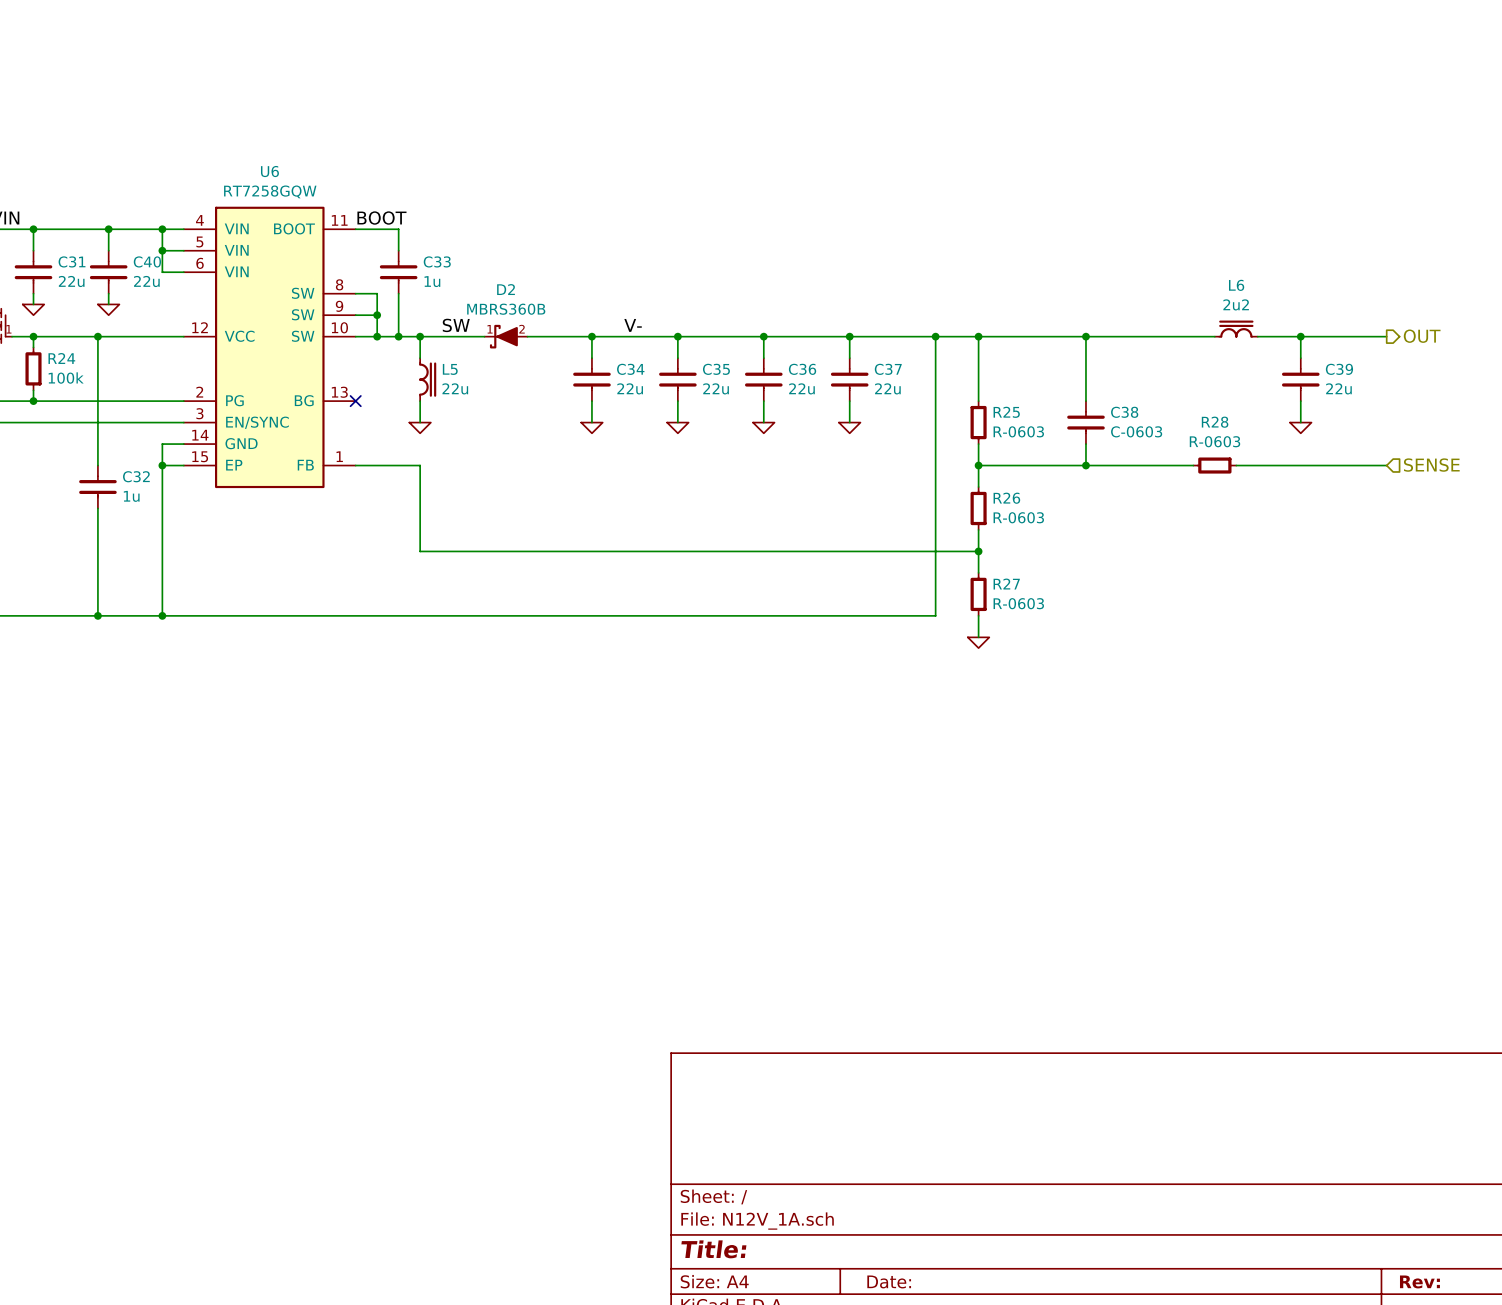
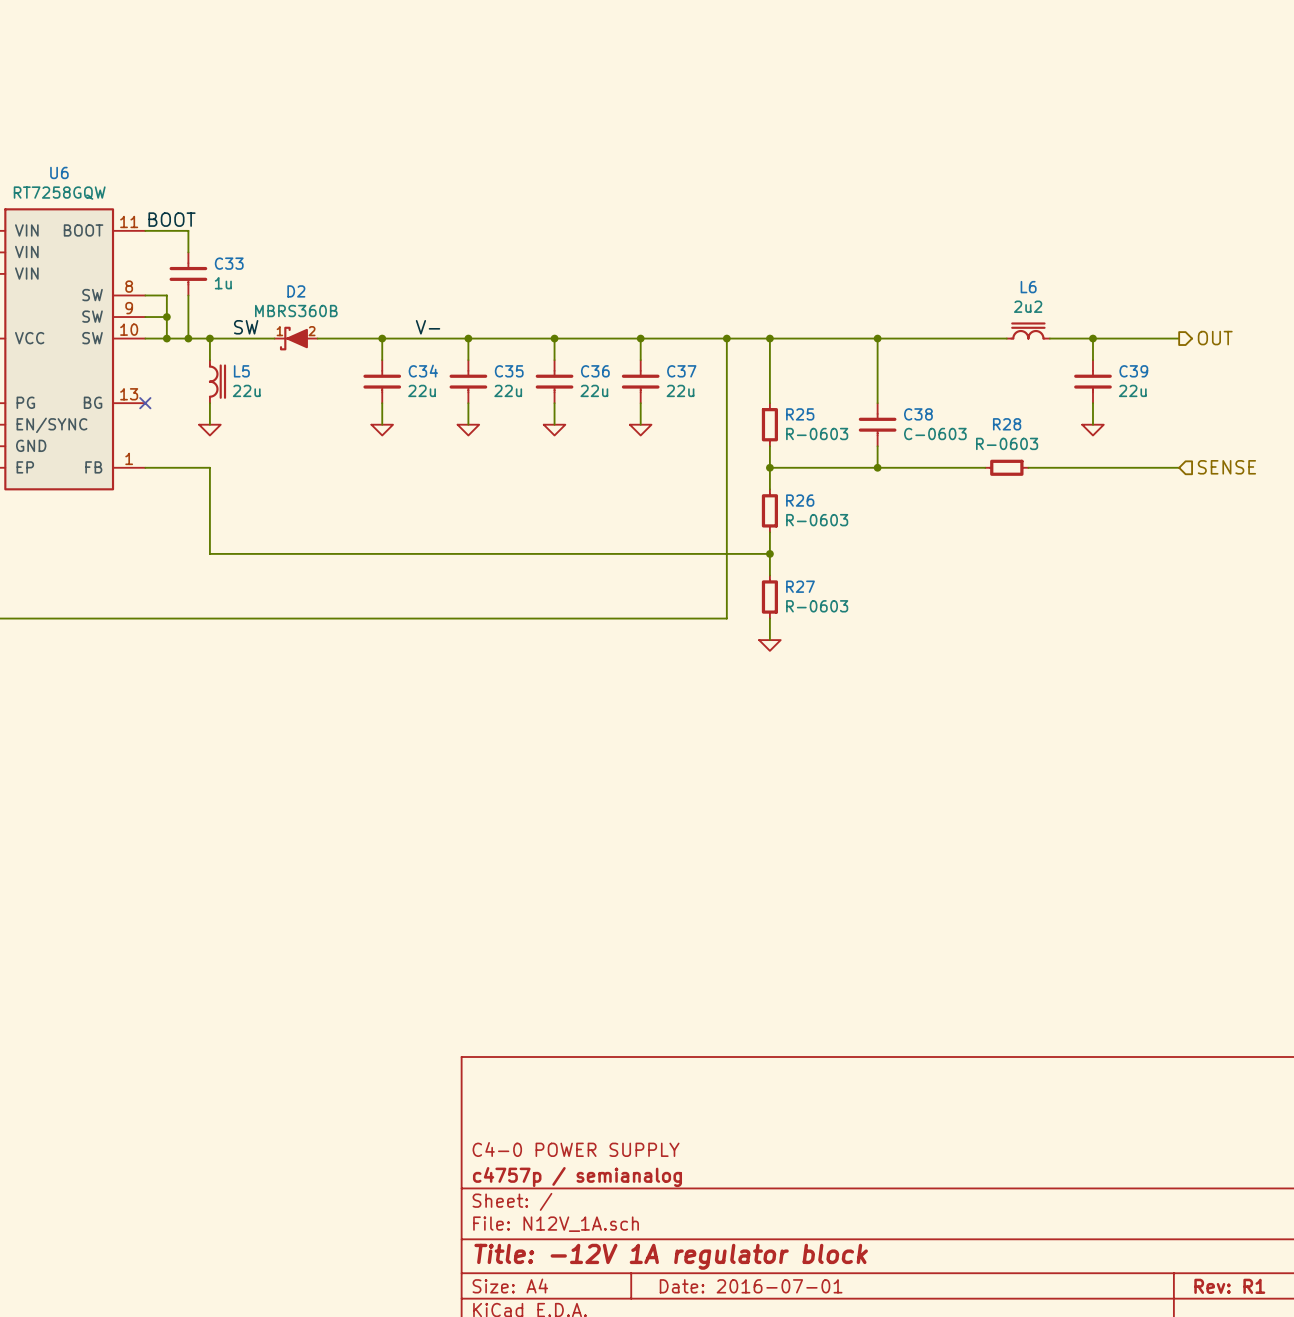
title block: none -> C4-0 POWER SUPPLY (576, 1149)
title block: none -> c4757p / semianalog (577, 1177)
title block: Title: (713, 1249) -> Title: -12V 1A regulator block (671, 1256)
title block: Date: (889, 1281) -> Date: 2016-07-01 (751, 1286)
title block: Rev: (1419, 1281) -> Rev: R1 (1229, 1286)

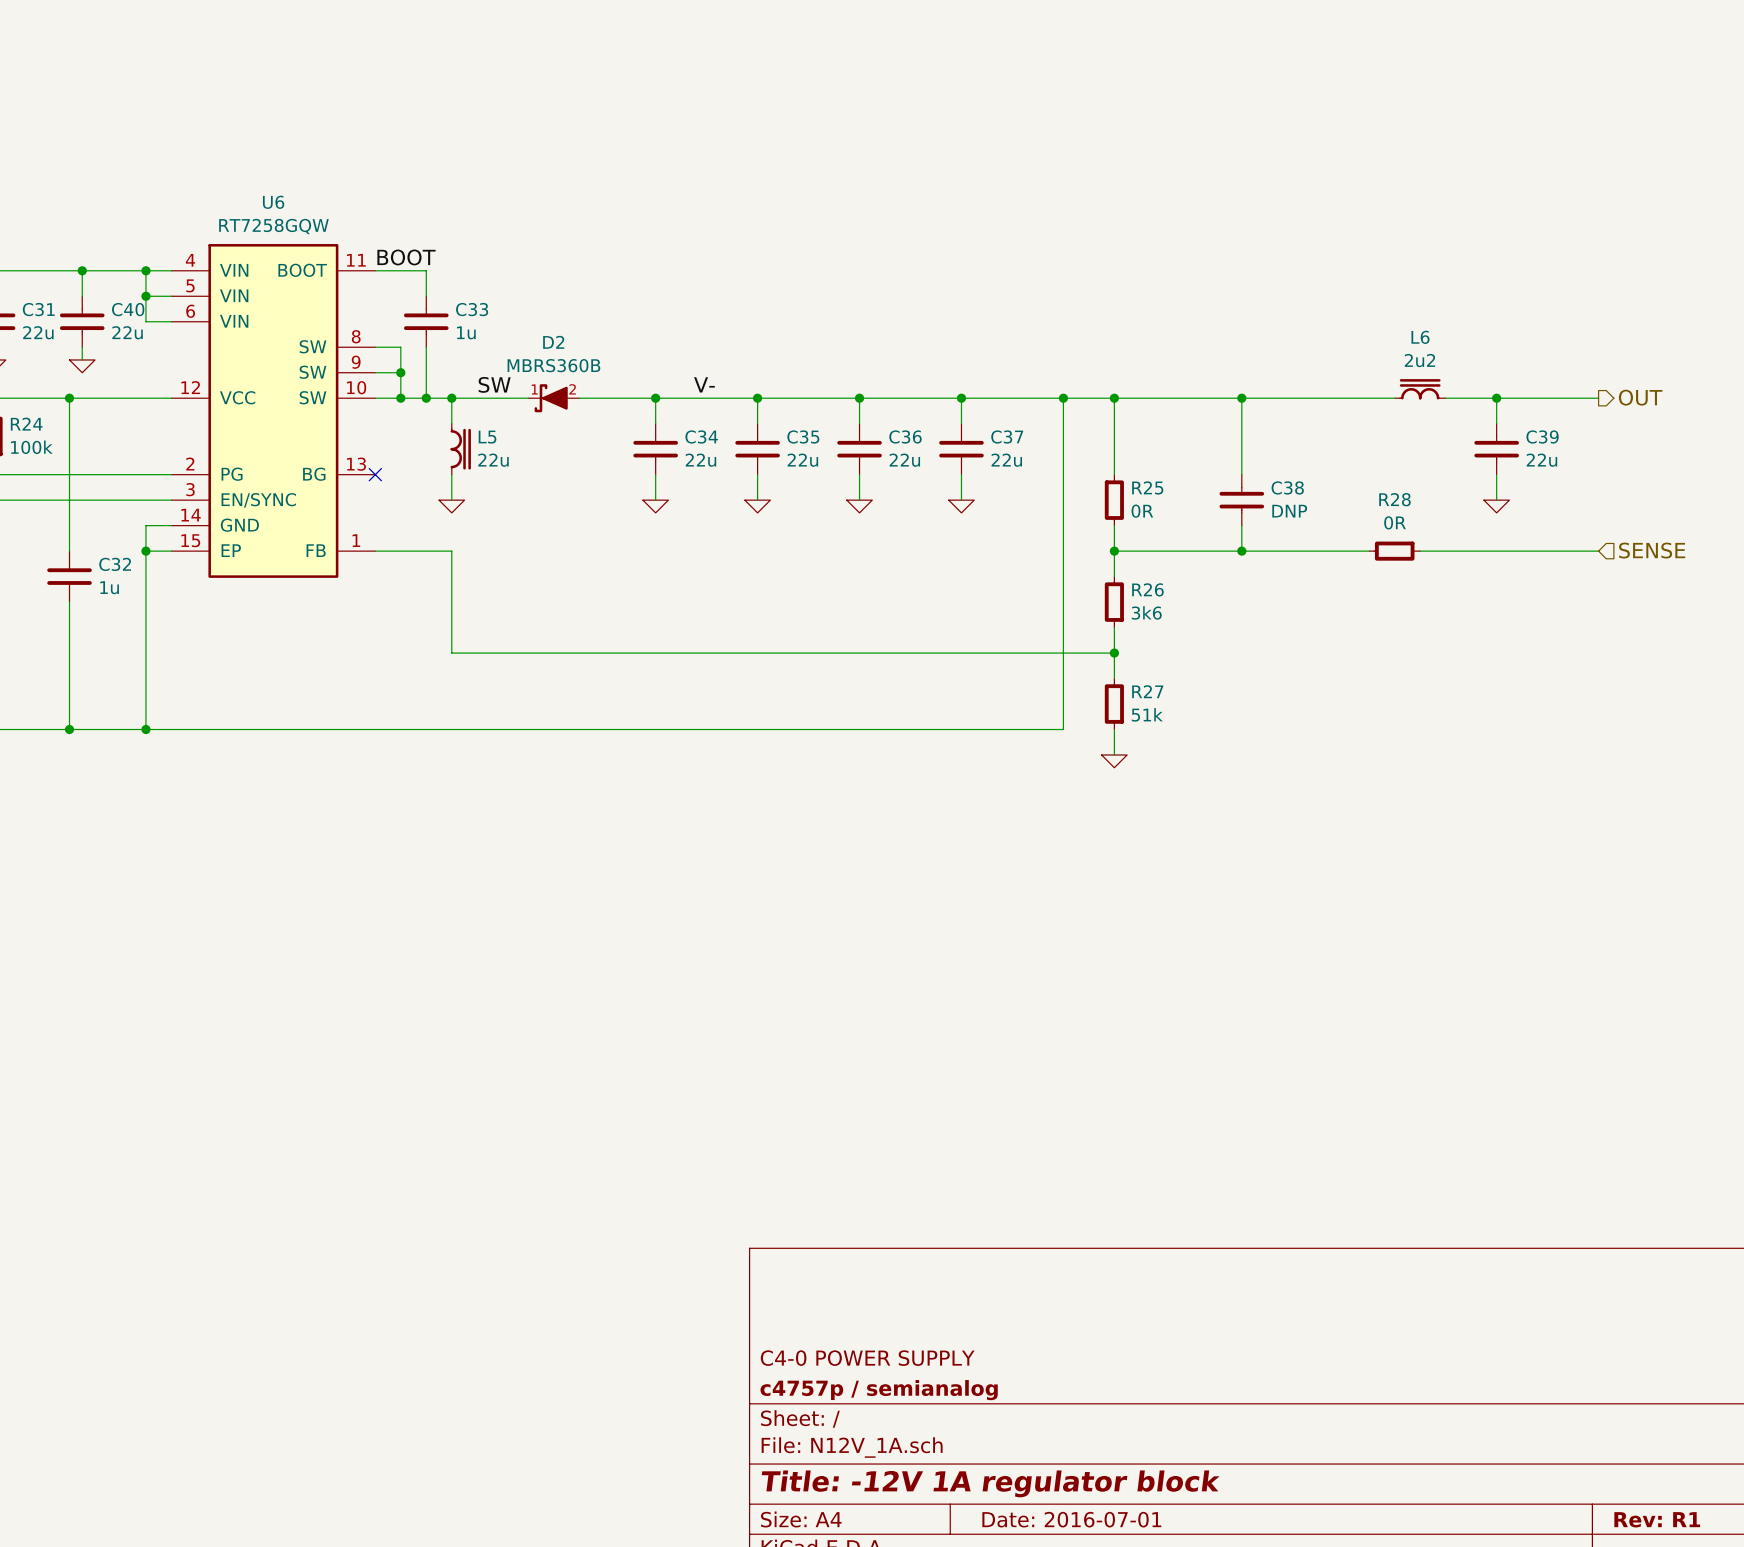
R25 value: R-0603 (817, 434) -> 0R (1142, 511)
C38 value: C-0603 (935, 434) -> DNP (1289, 511)
R28 value: R-0603 (1007, 443) -> 0R (1395, 522)
R26 value: R-0603 (817, 520) -> 3k6 (1146, 612)
R27 value: R-0603 (817, 606) -> 51k (1147, 714)

